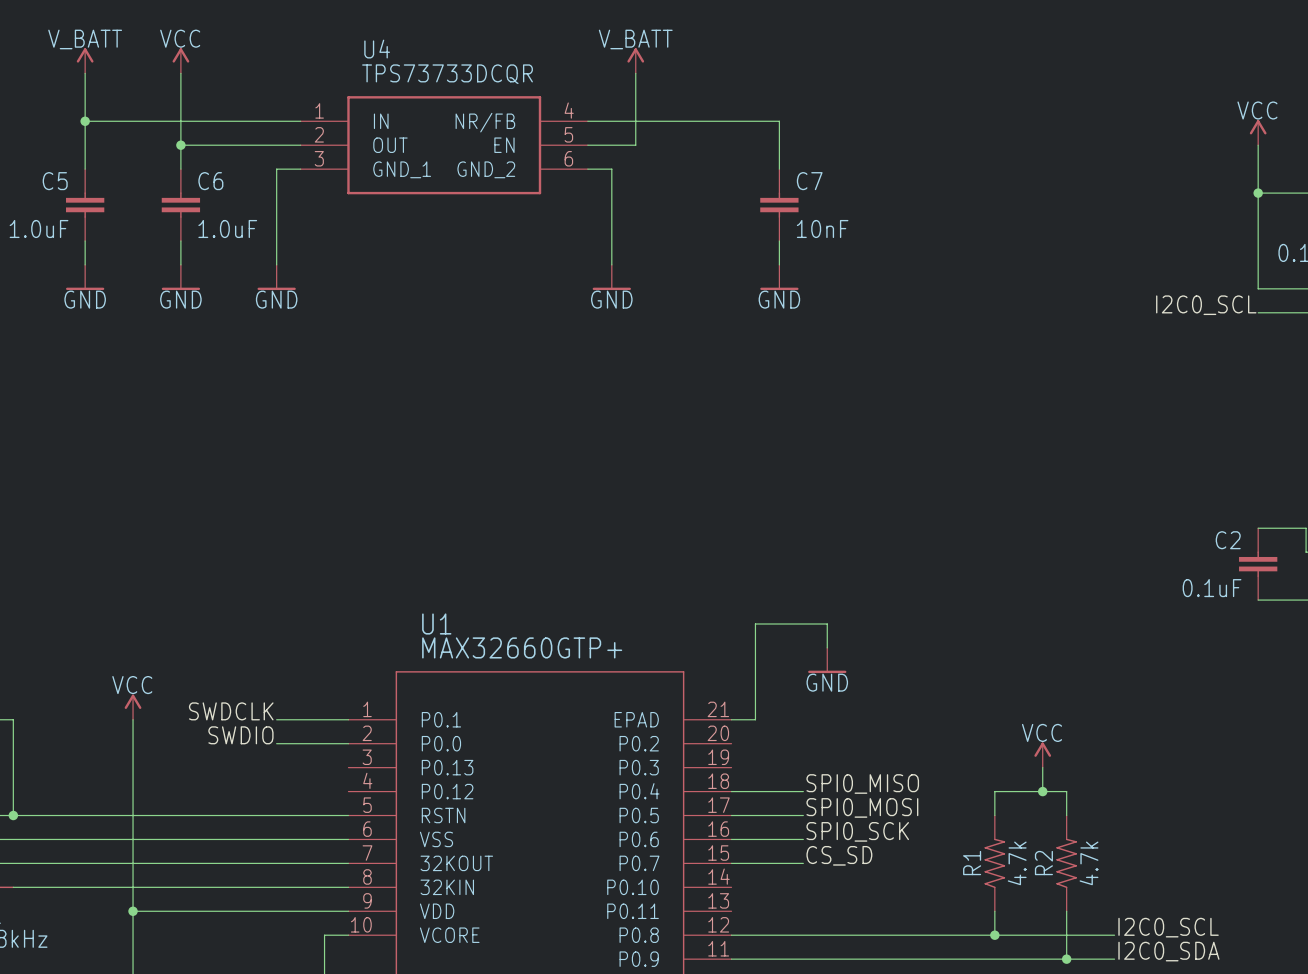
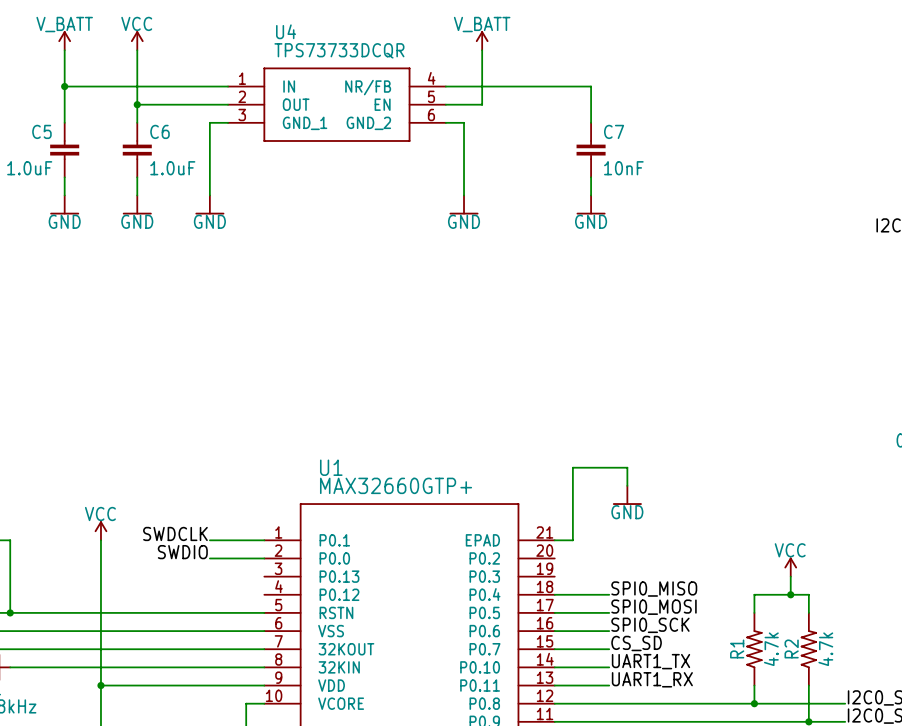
label: none -> UART1_TX (651, 661)
wire: none -> (554, 667) (609, 667)
label: none -> UART1_RX (652, 679)
wire: none -> (554, 685) (609, 685)

